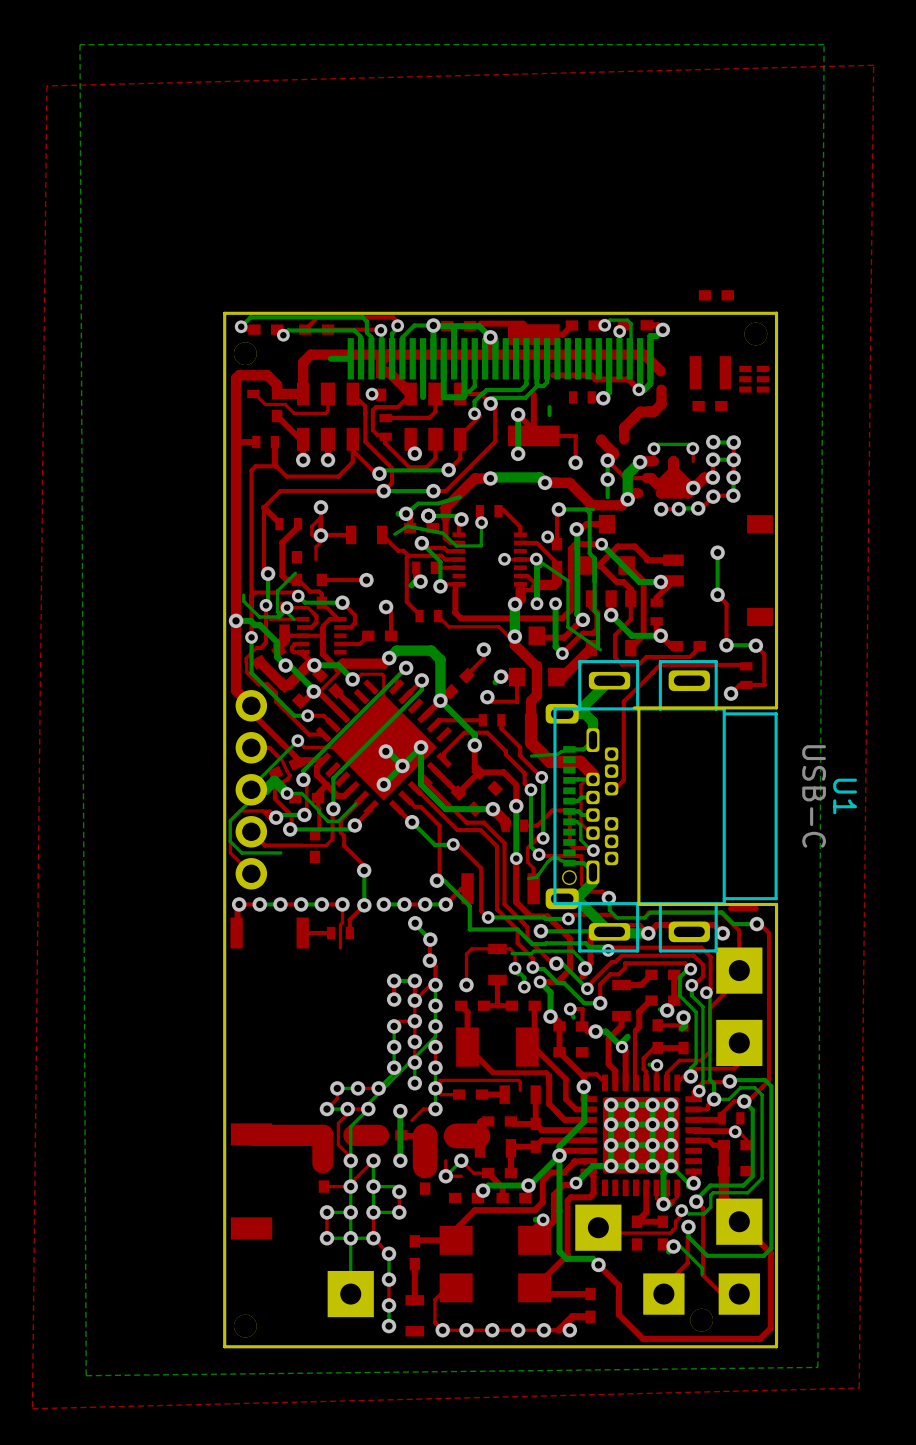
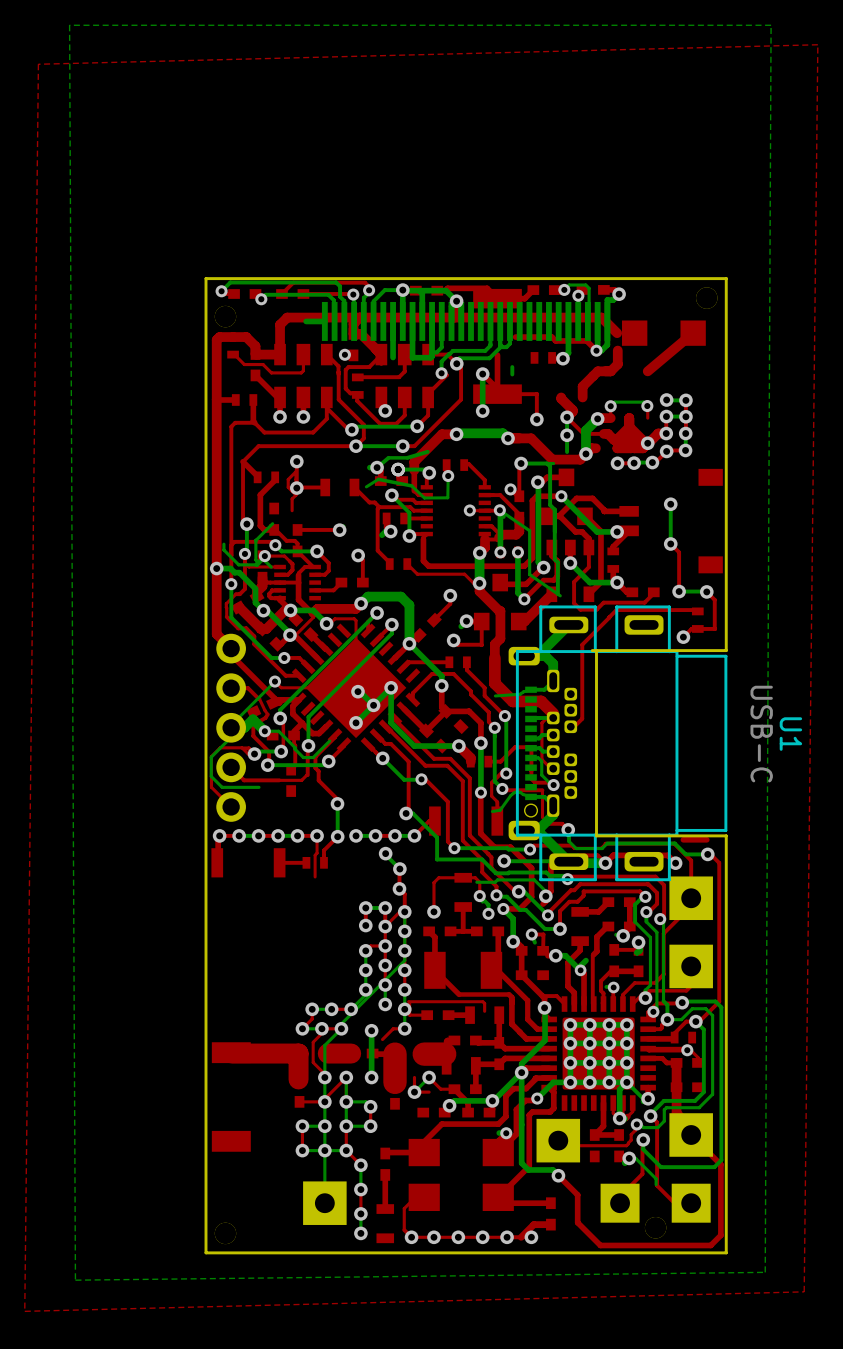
part: (716, 295) -> none
part footprint: [689, 356, 732, 390] -> [622, 320, 706, 346]
top track: none -> (693, 333) (647, 371)
part: (754, 379) -> none
part: (709, 406) -> none

